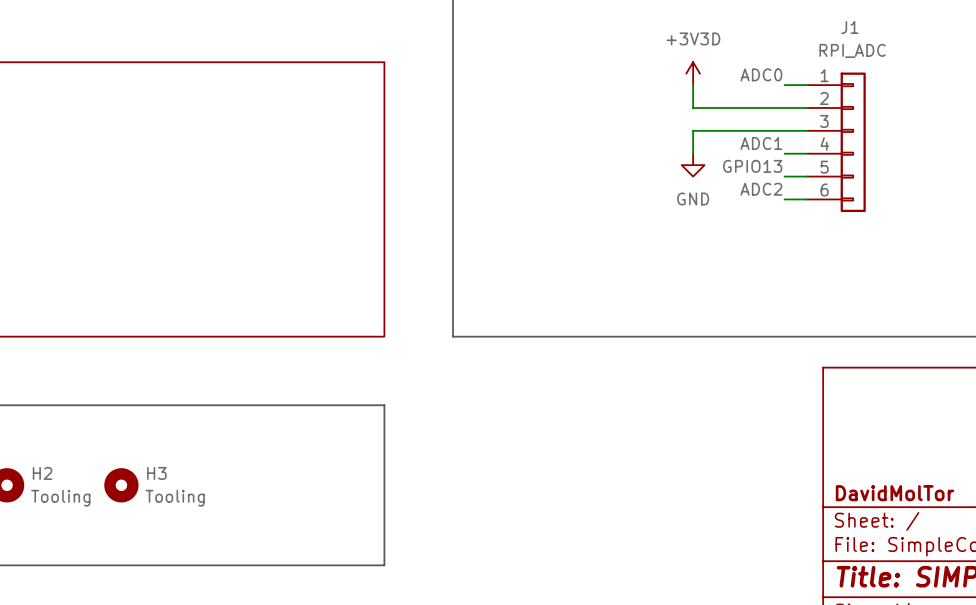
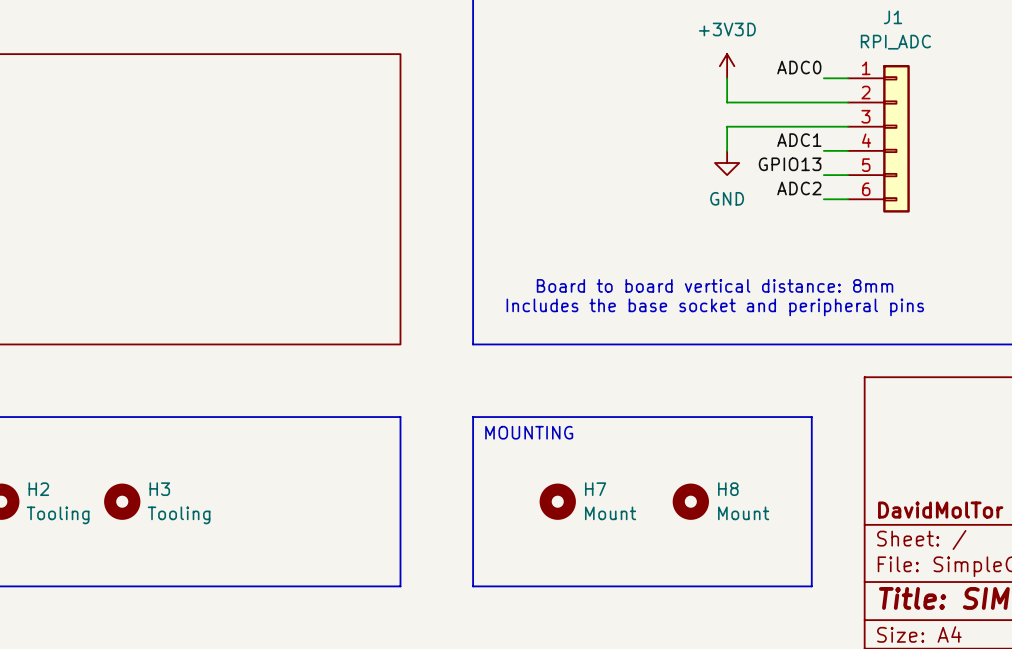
text: none -> Board to board vertical distance: 8mm (715, 285)
text: none -> Includes the base socket and peripheral pins (715, 307)
line: none -> (473, 417) (811, 417) (811, 586) (473, 586) (473, 417)
text: none -> MOUNTING (529, 432)
H7: none -> Mount (557, 501)
H8: none -> Mount (690, 501)

